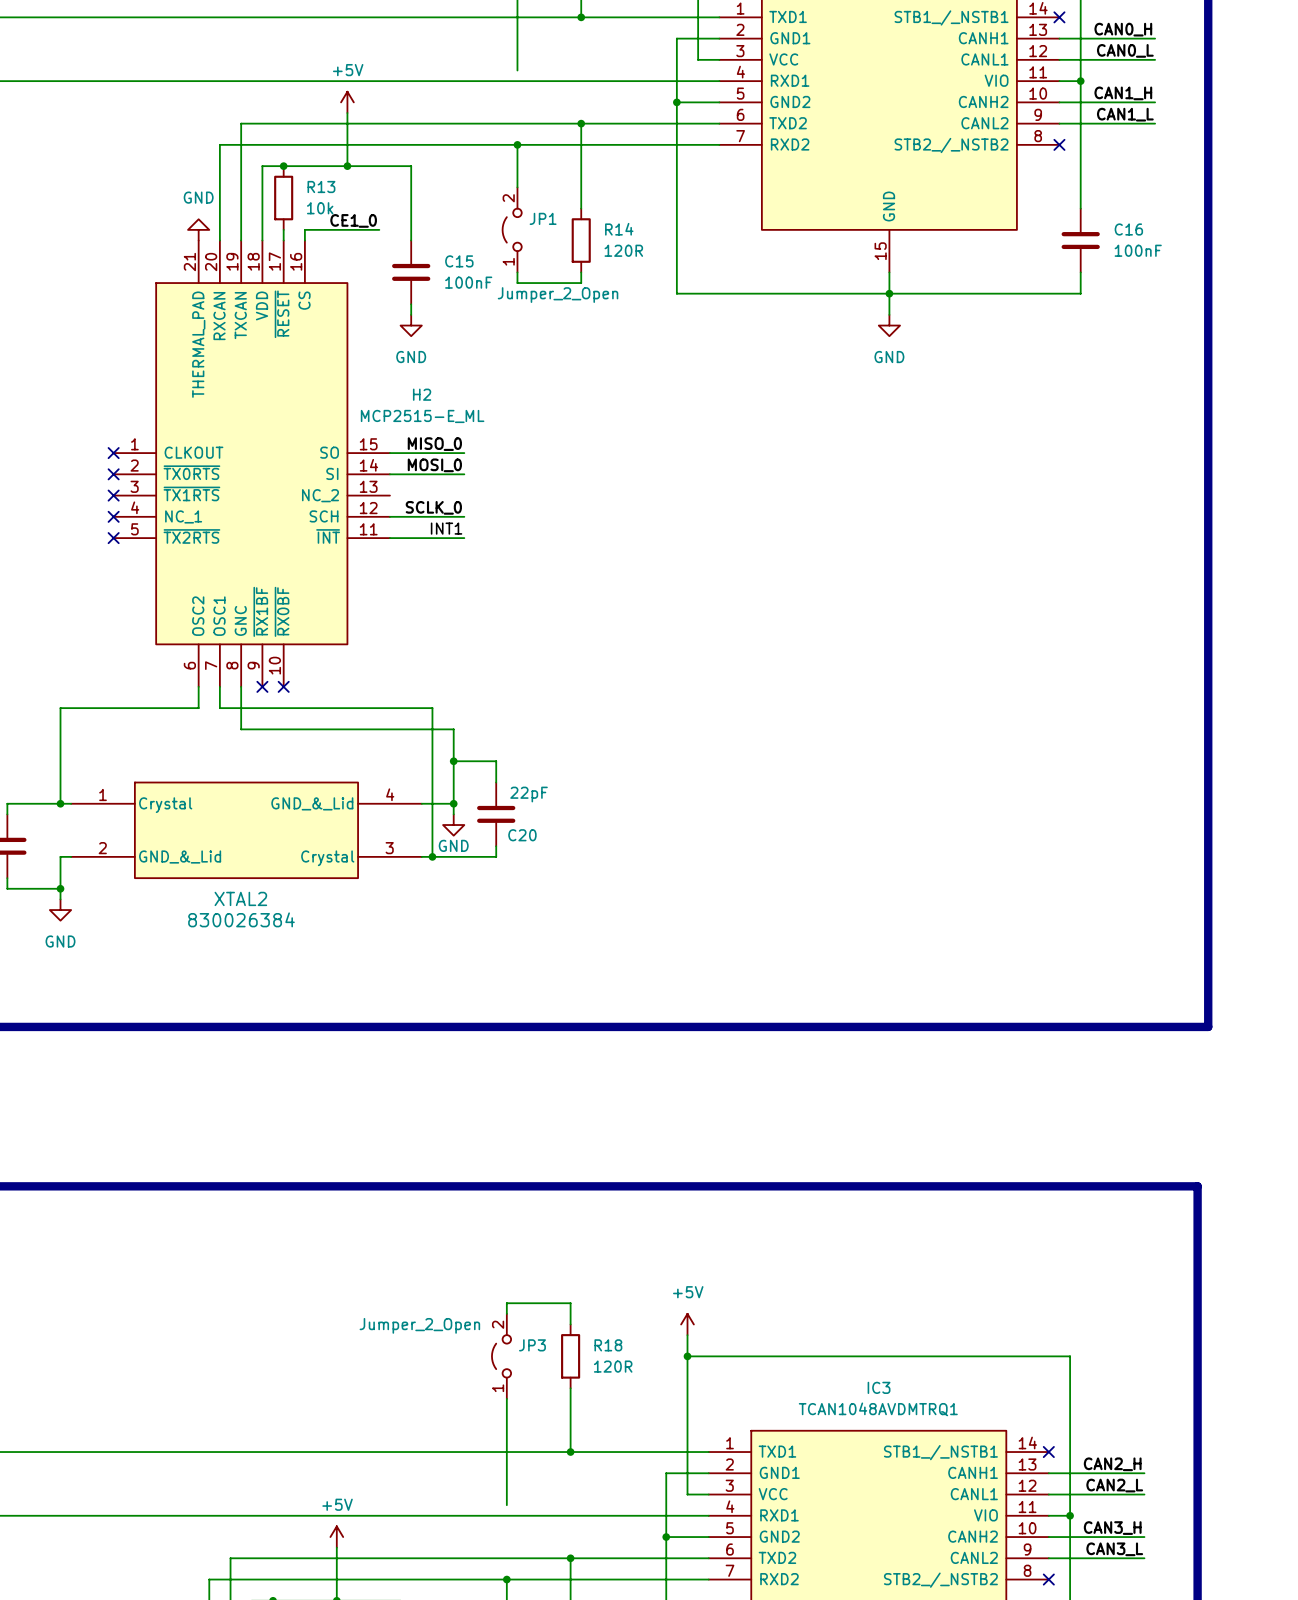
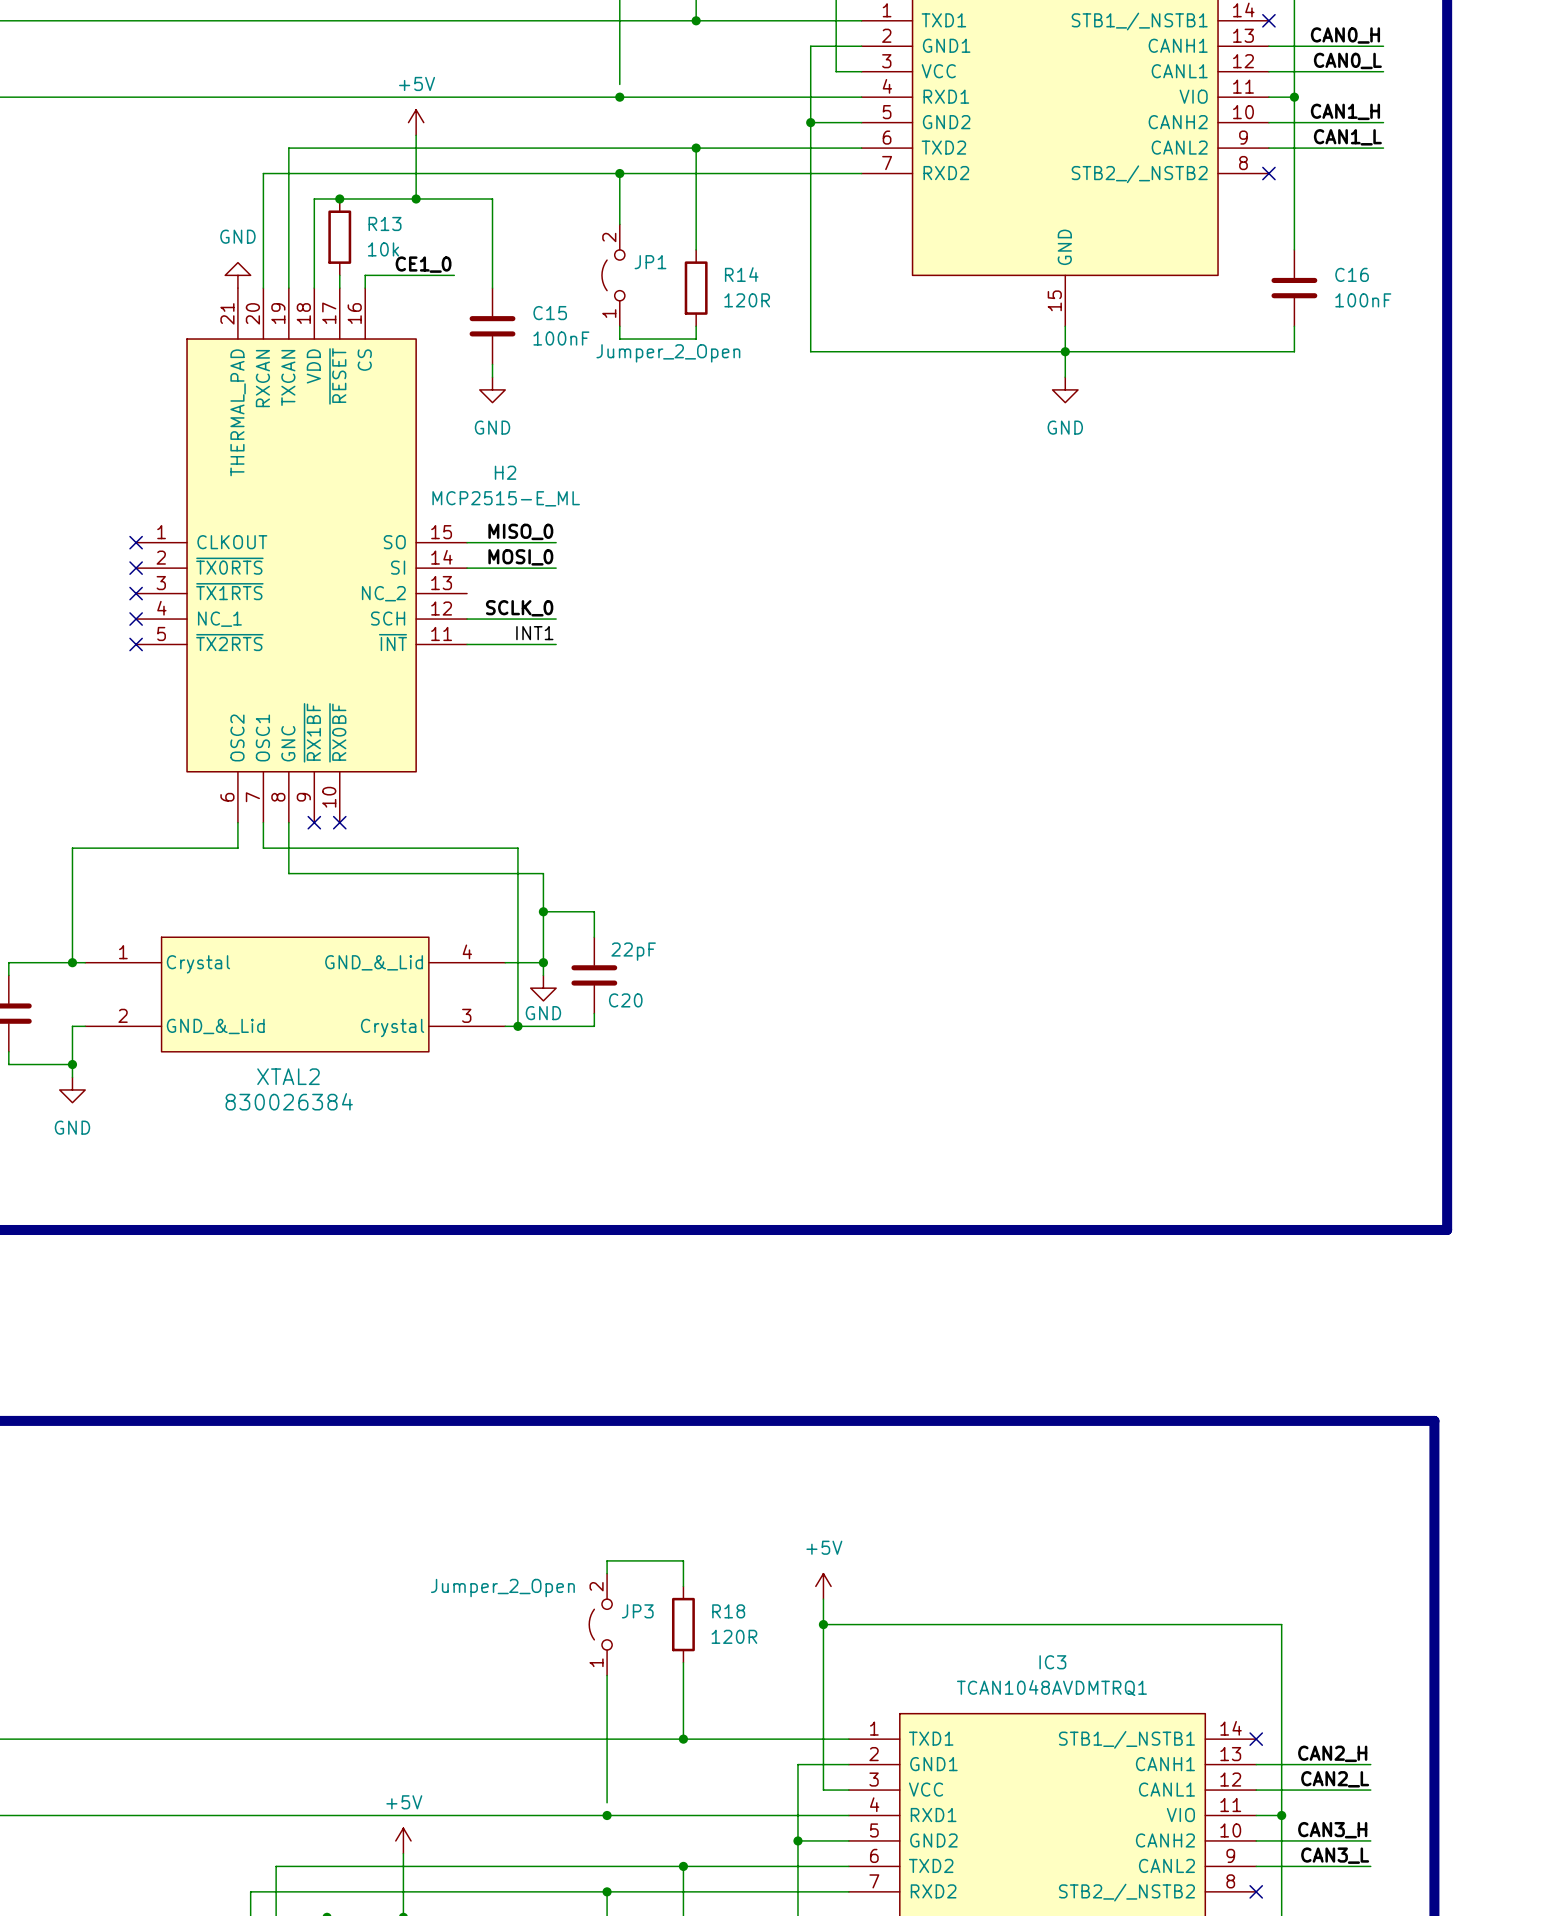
junction: none -> (619, 97)
junction: none -> (607, 1815)

